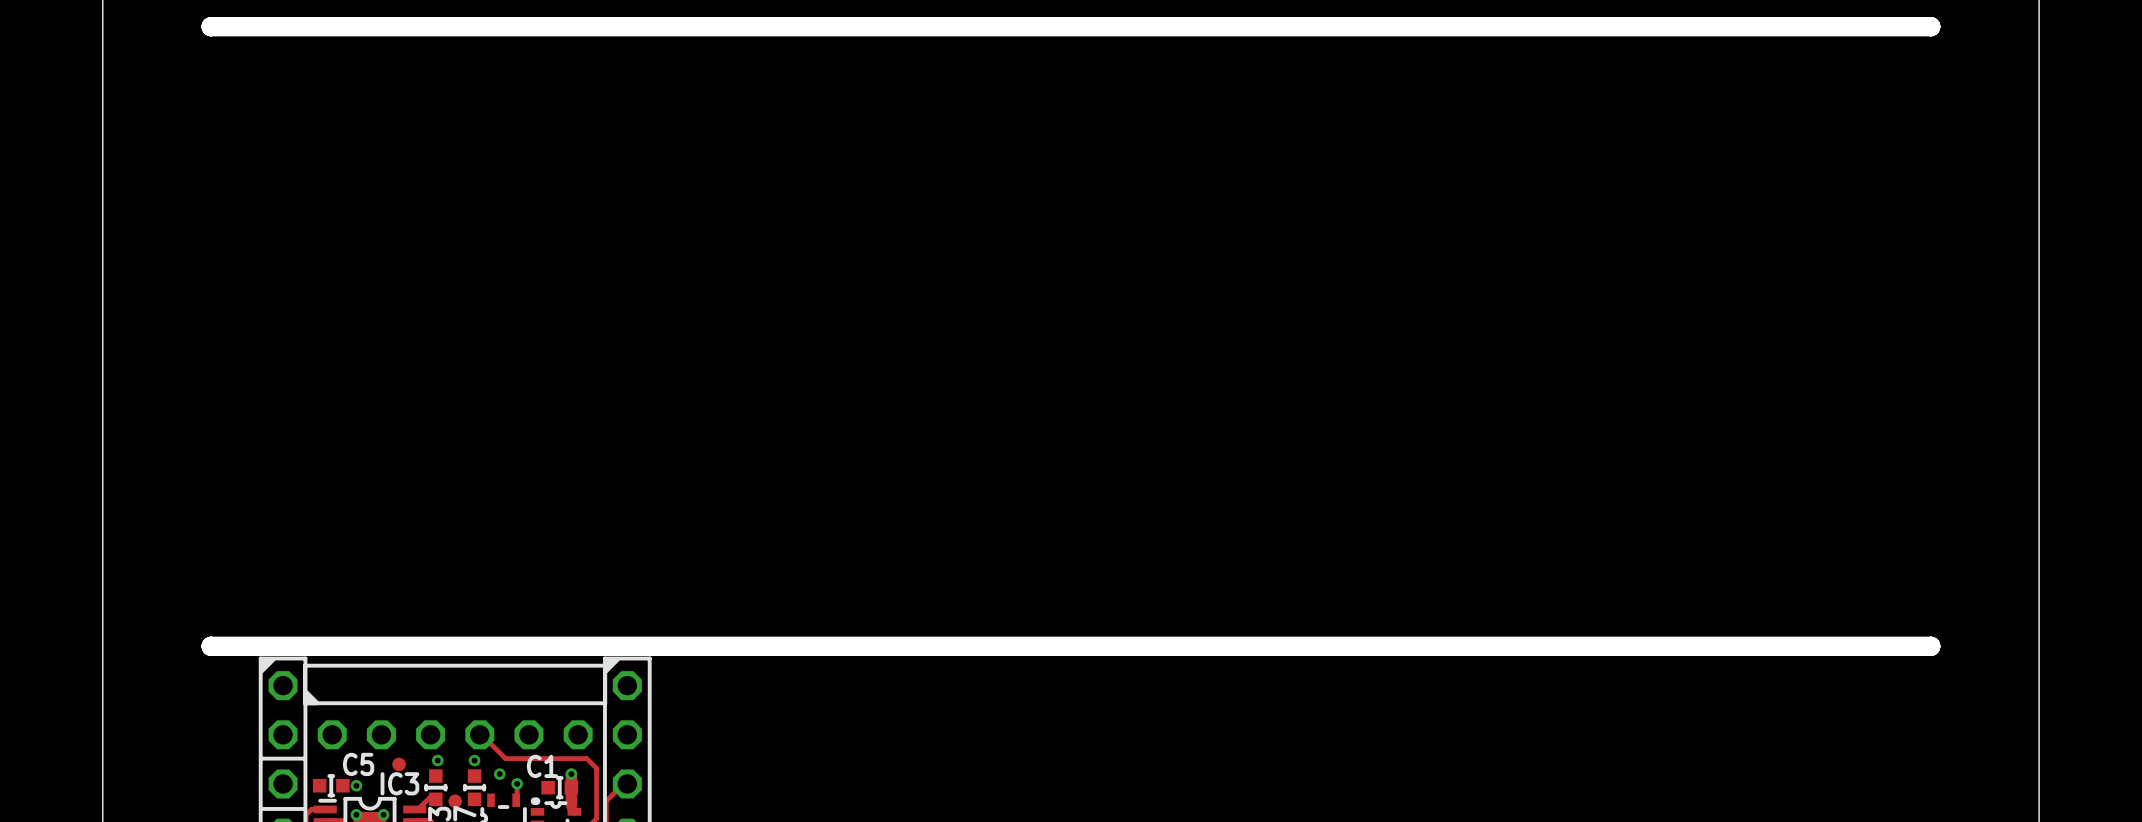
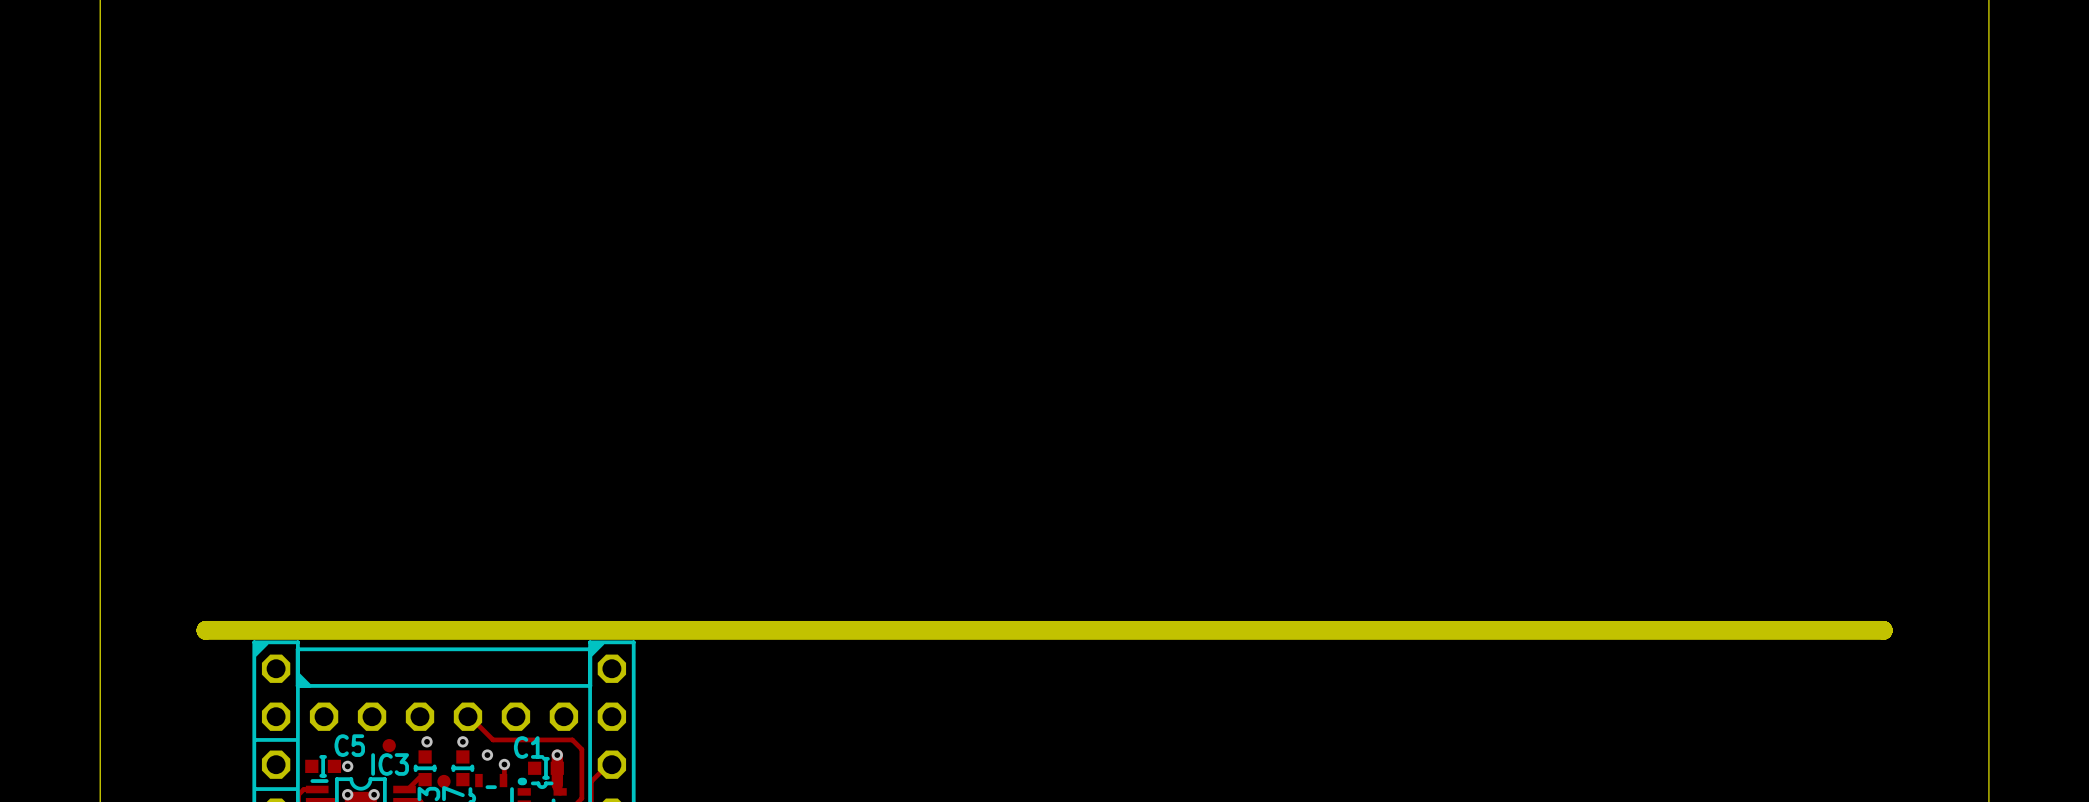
board edge: (210, 21) (206, 27) (211, 31) (1930, 31) (1935, 26) (1930, 21) (210, 21) -> none

